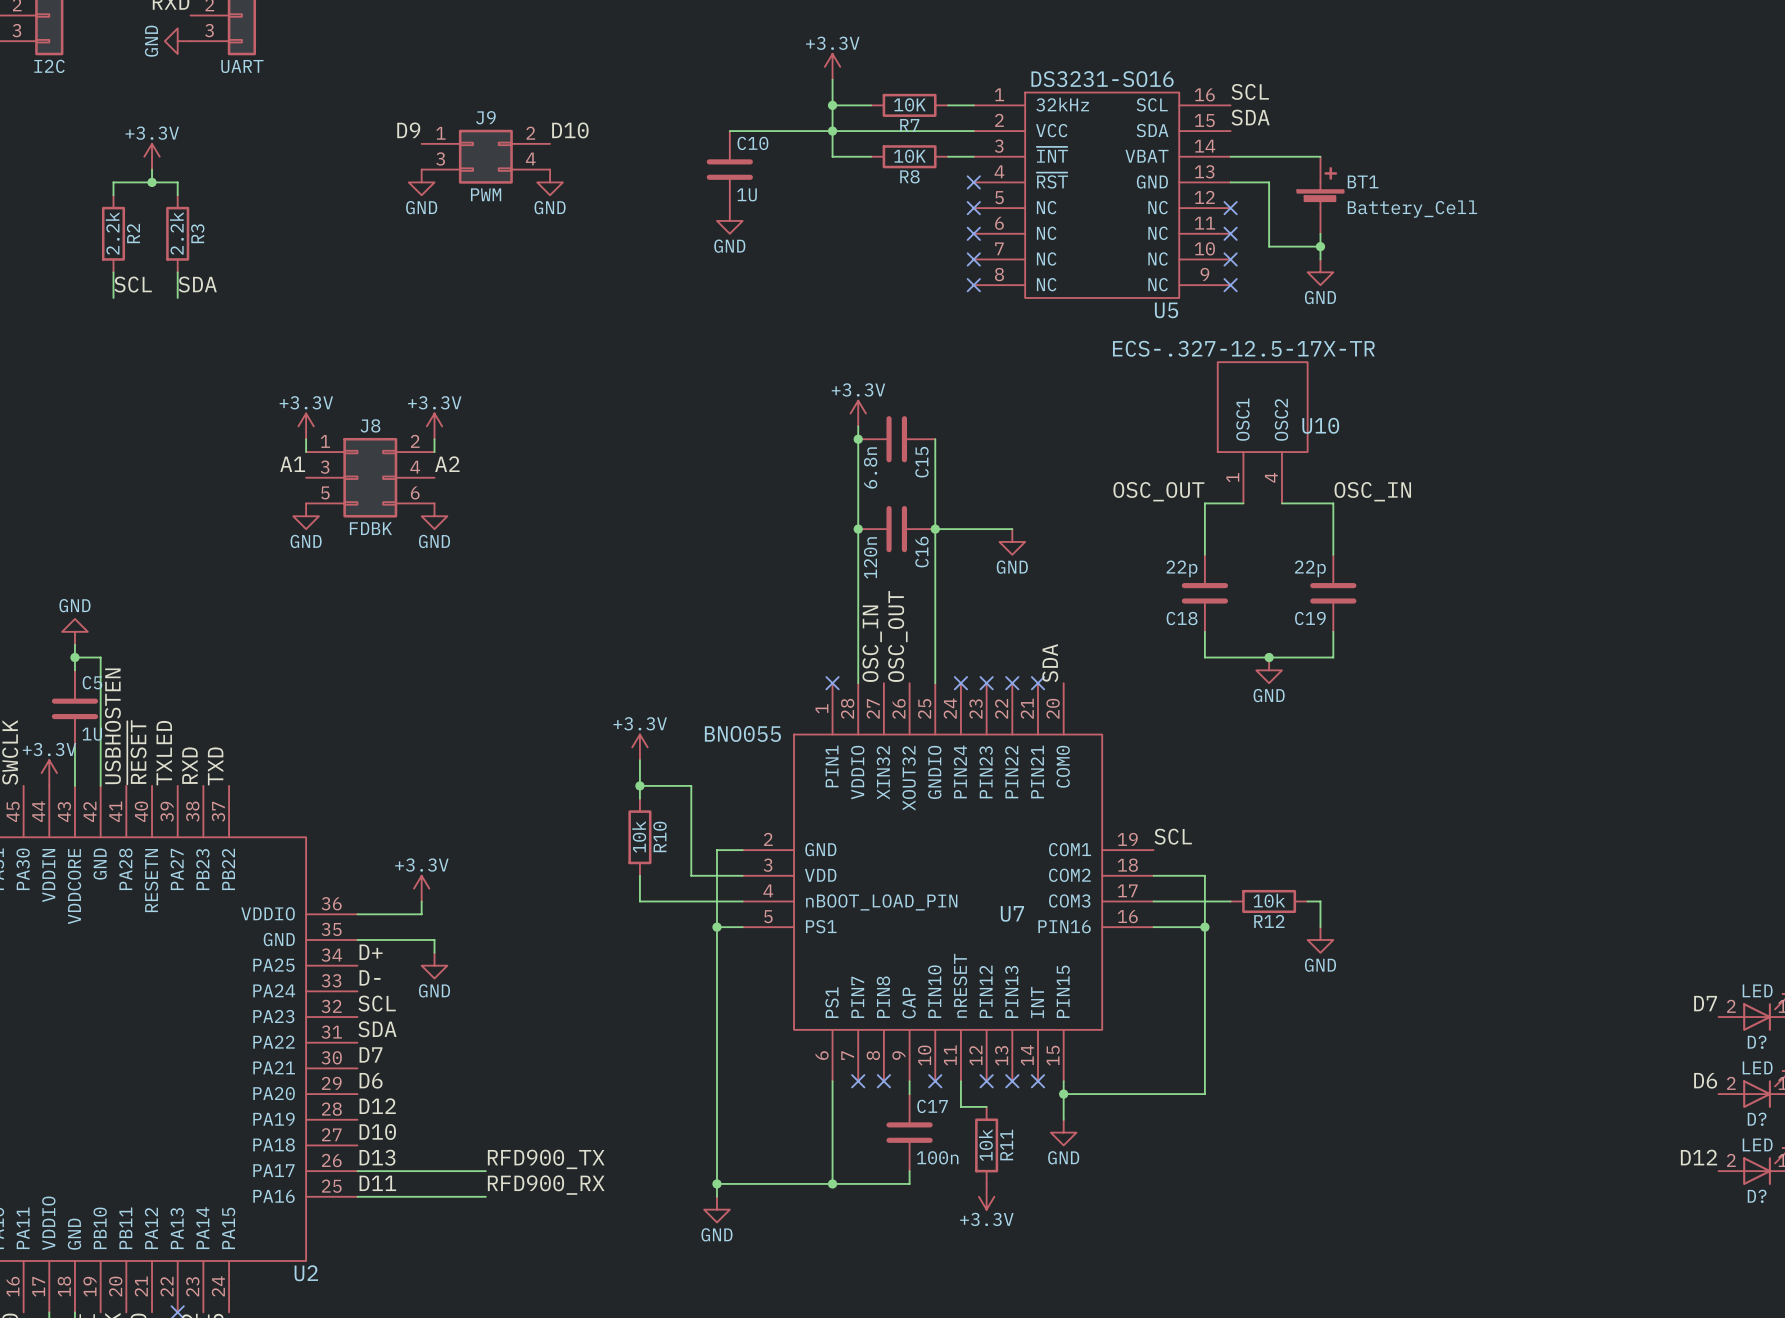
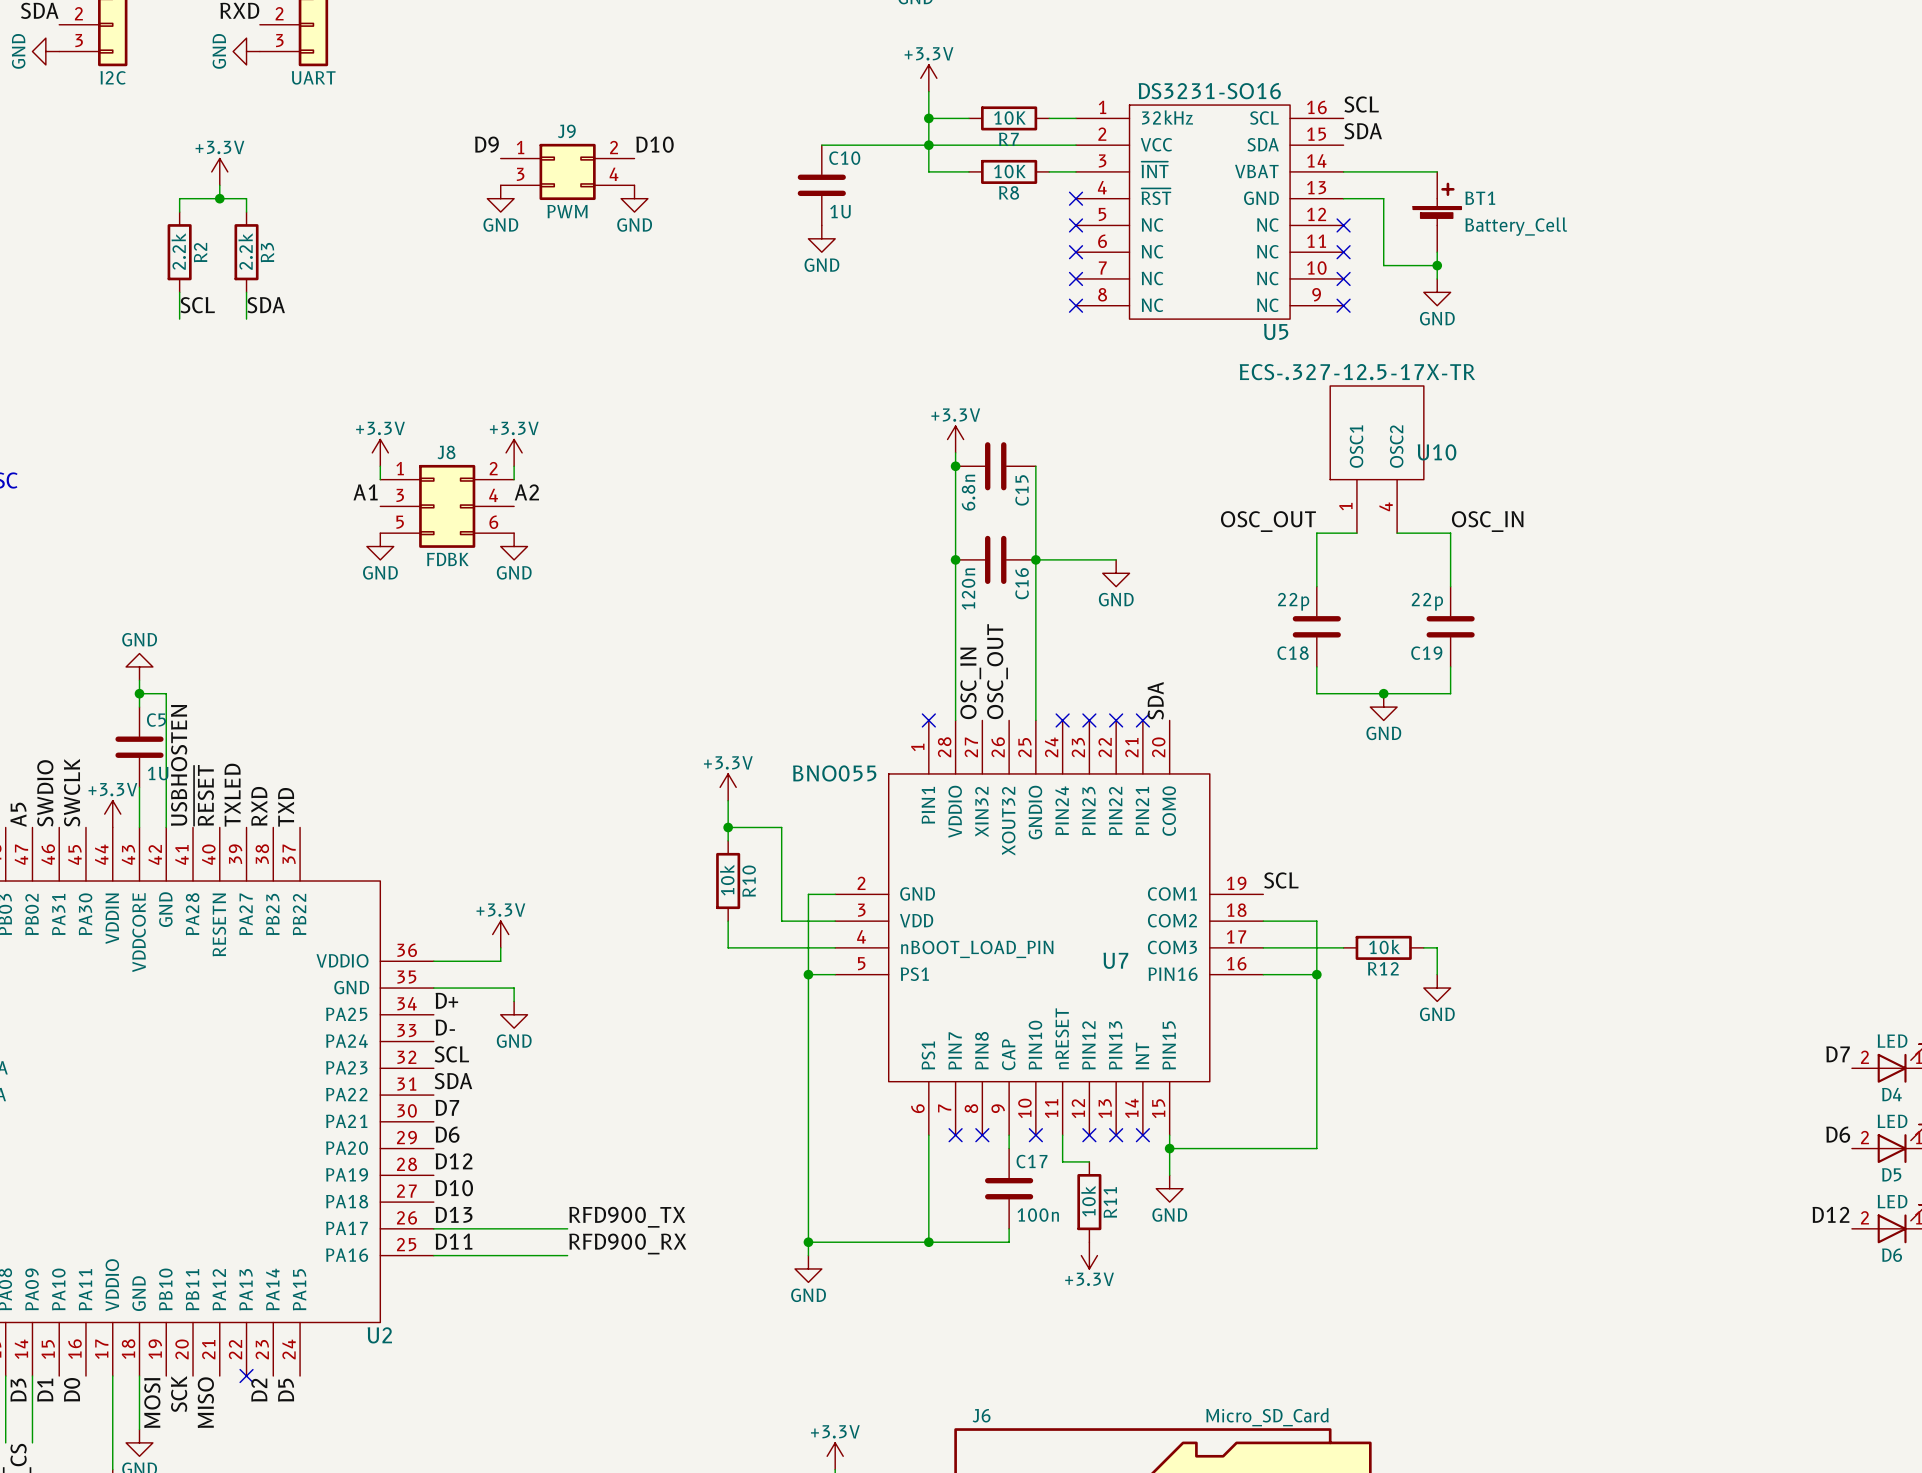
D? name: D? (1757, 1042) -> D4 (1891, 1094)
D? name: D? (1757, 1119) -> D5 (1891, 1174)
D? name: D? (1757, 1196) -> D6 (1892, 1255)

